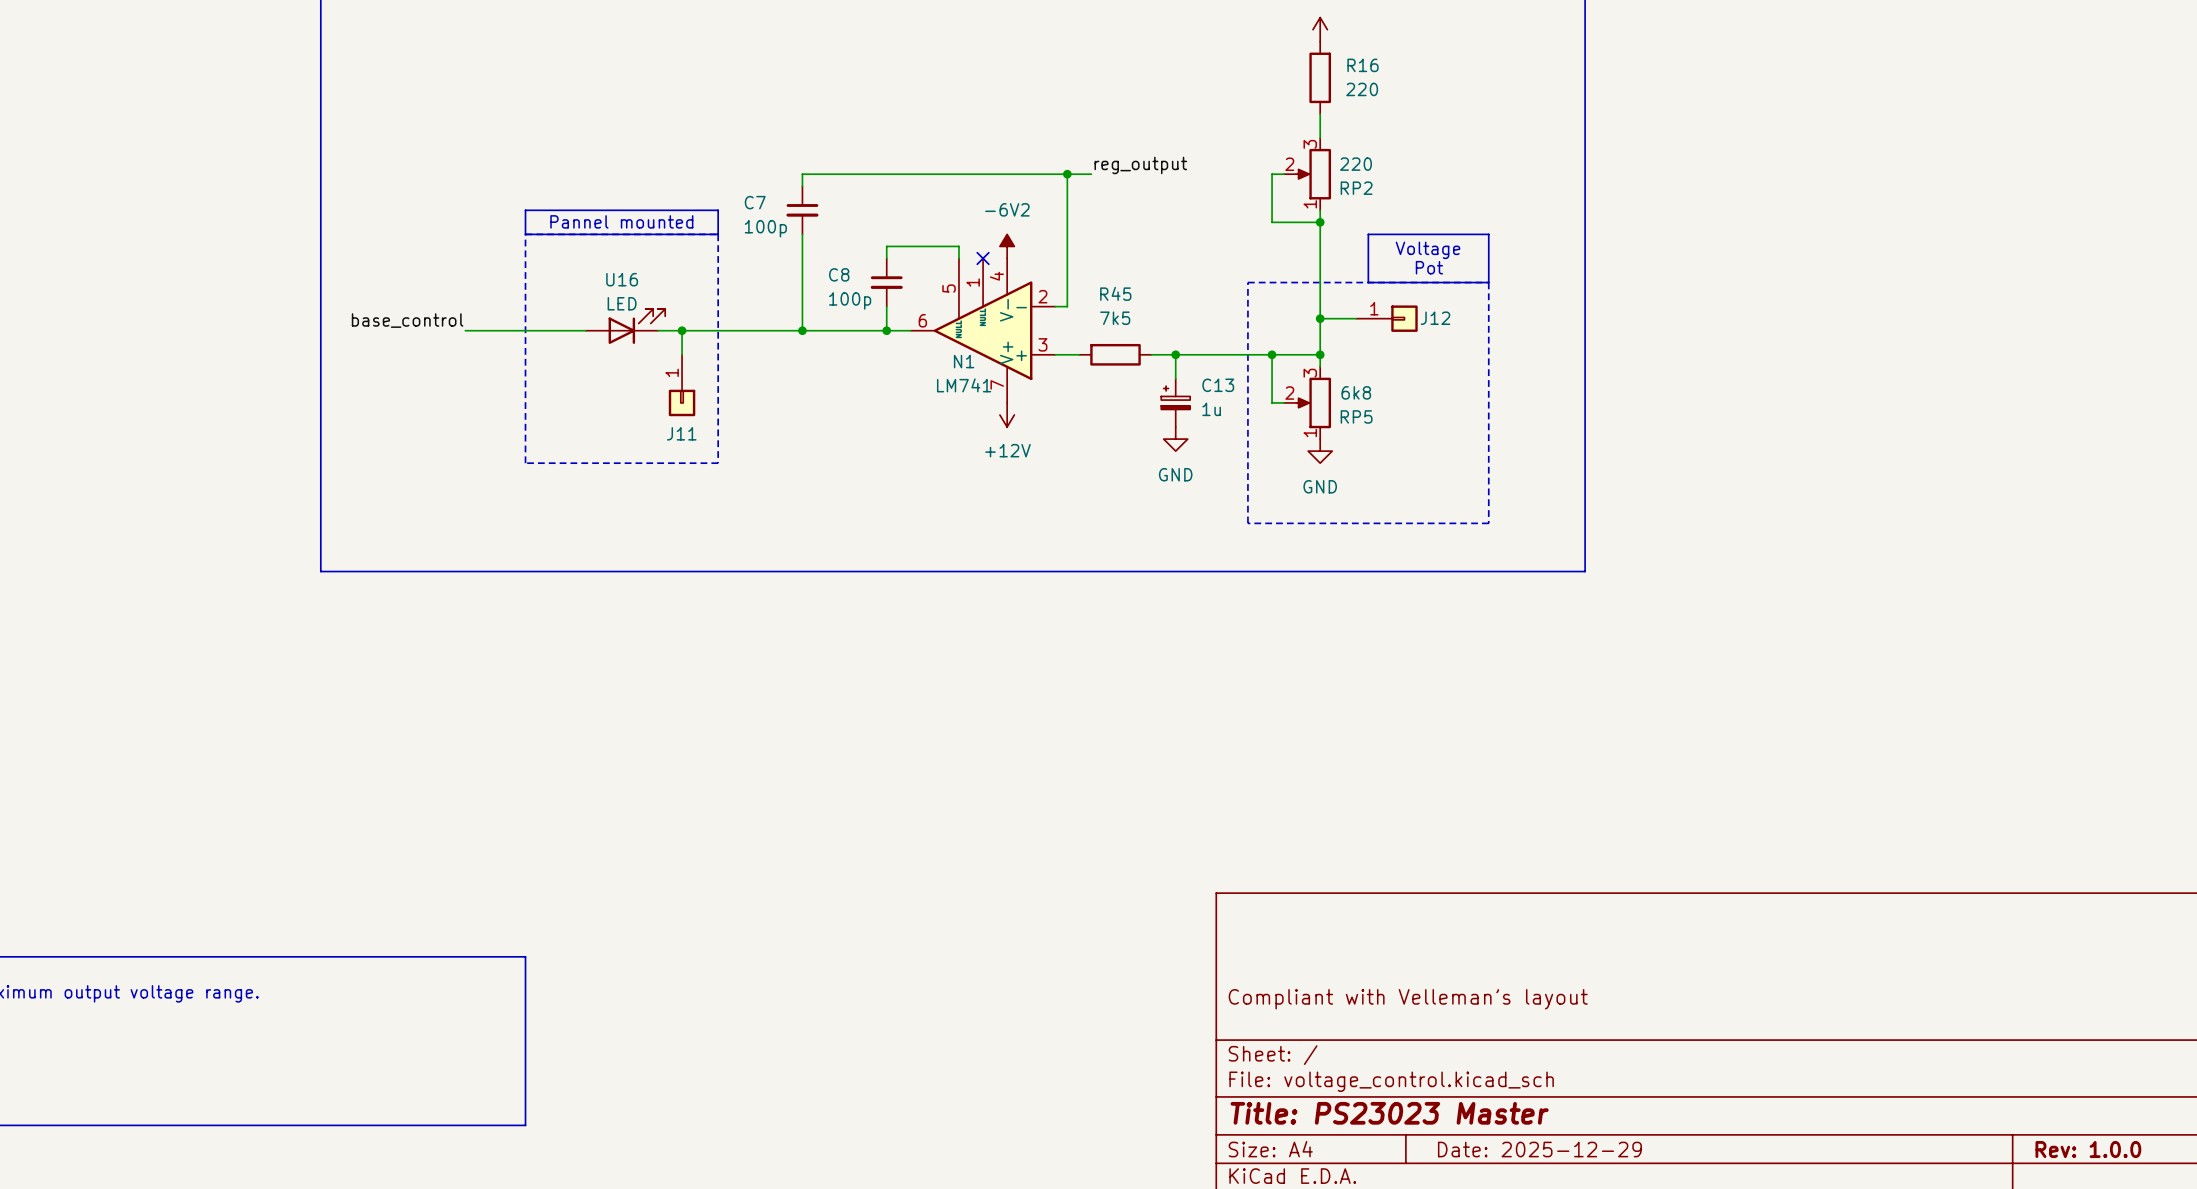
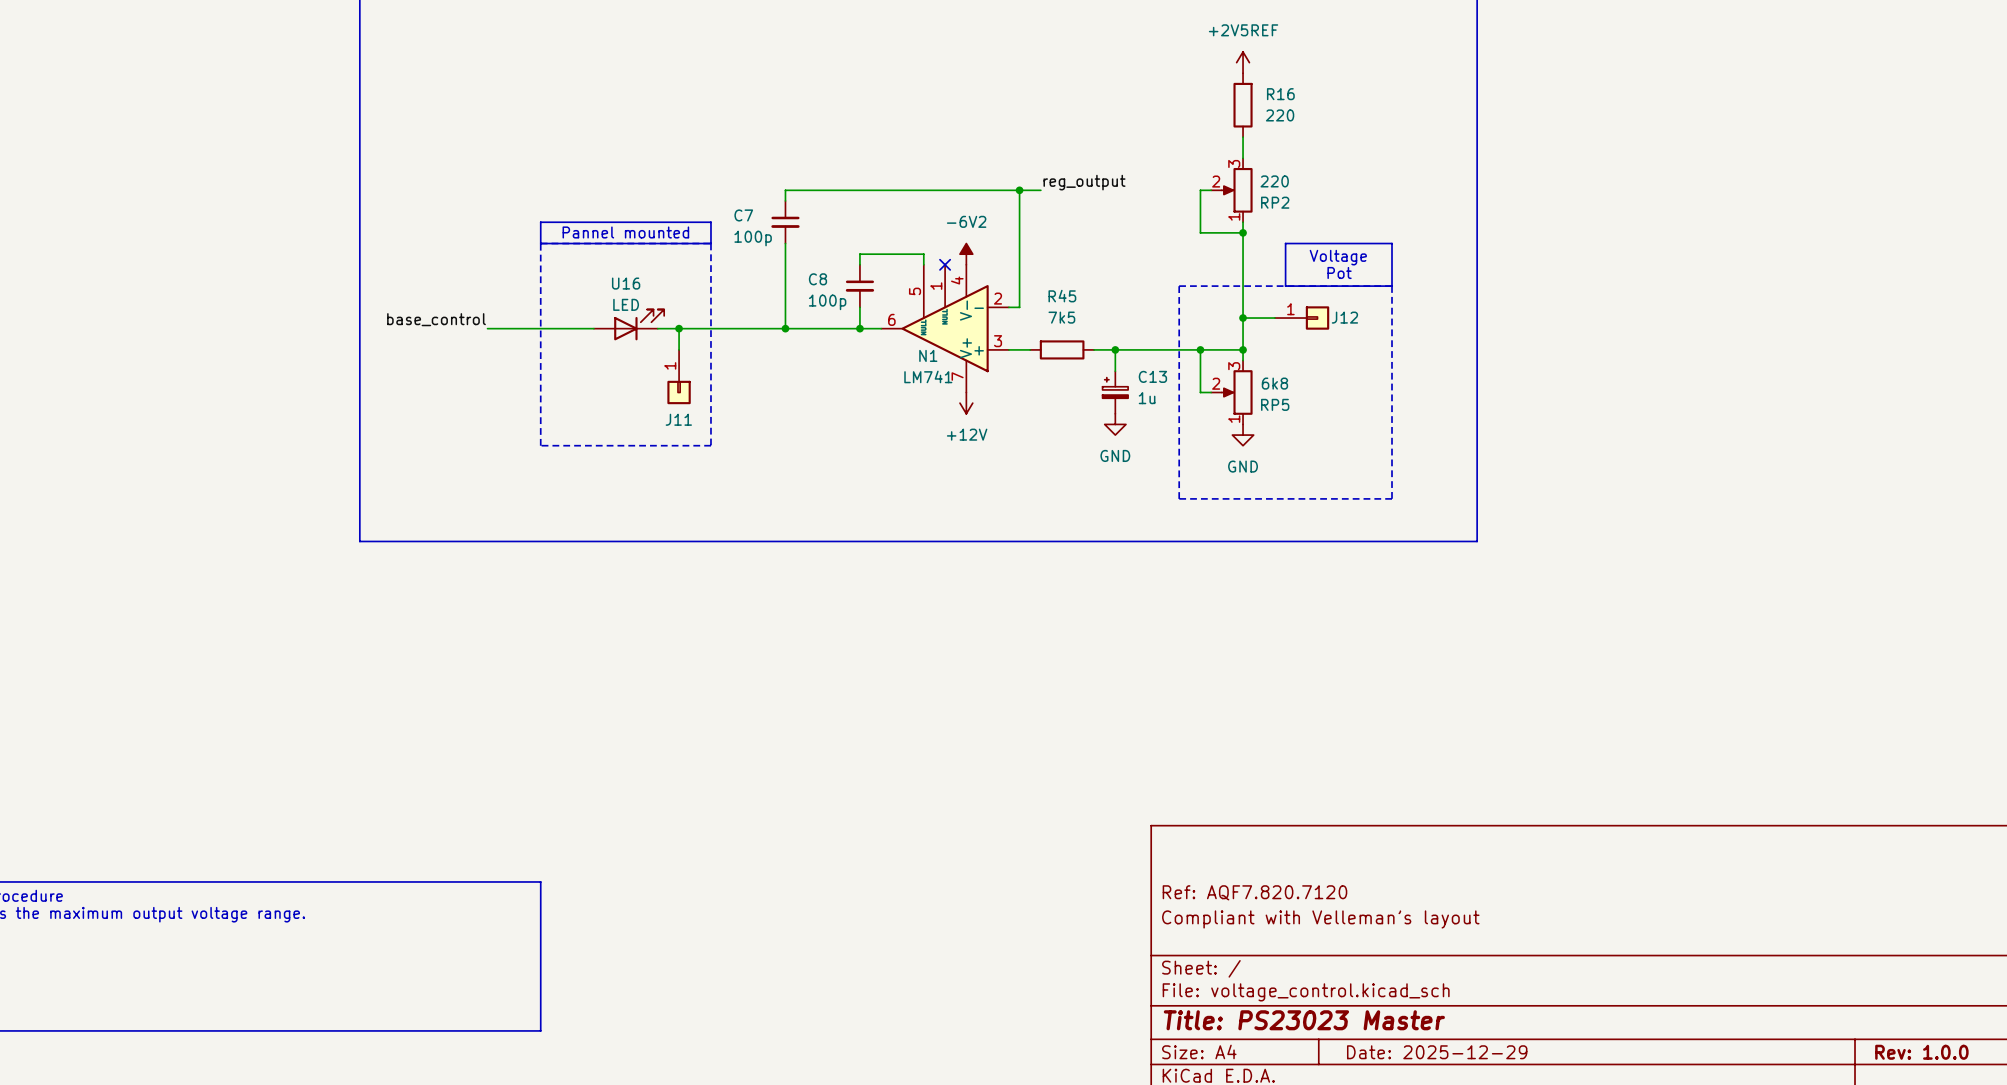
title block: none -> Ref: AQF7.820.7120 (1254, 892)

